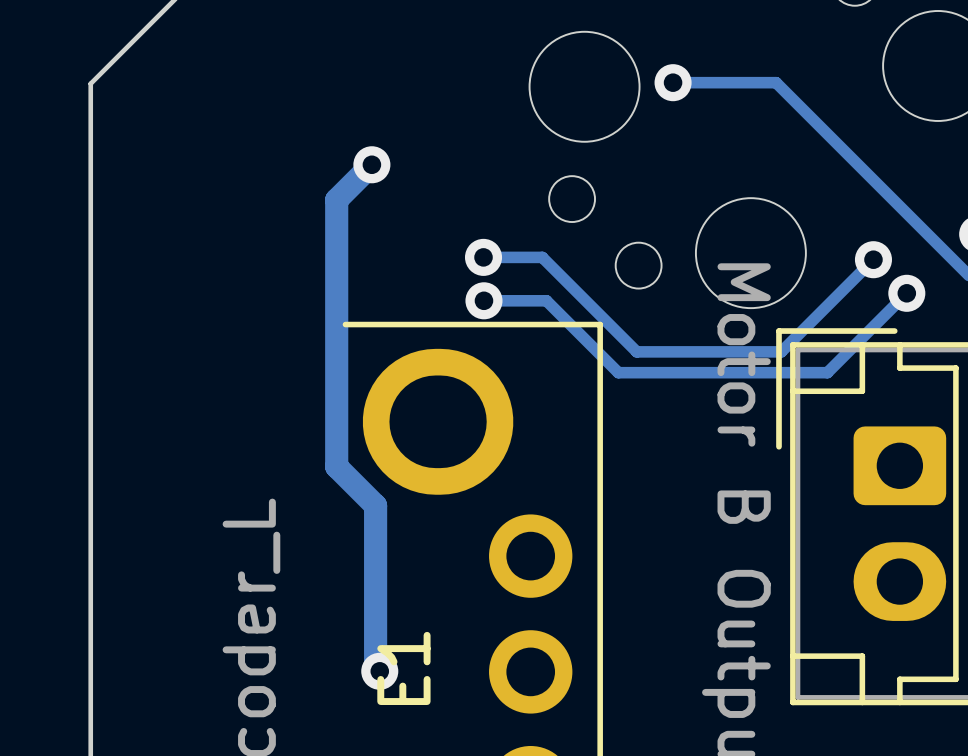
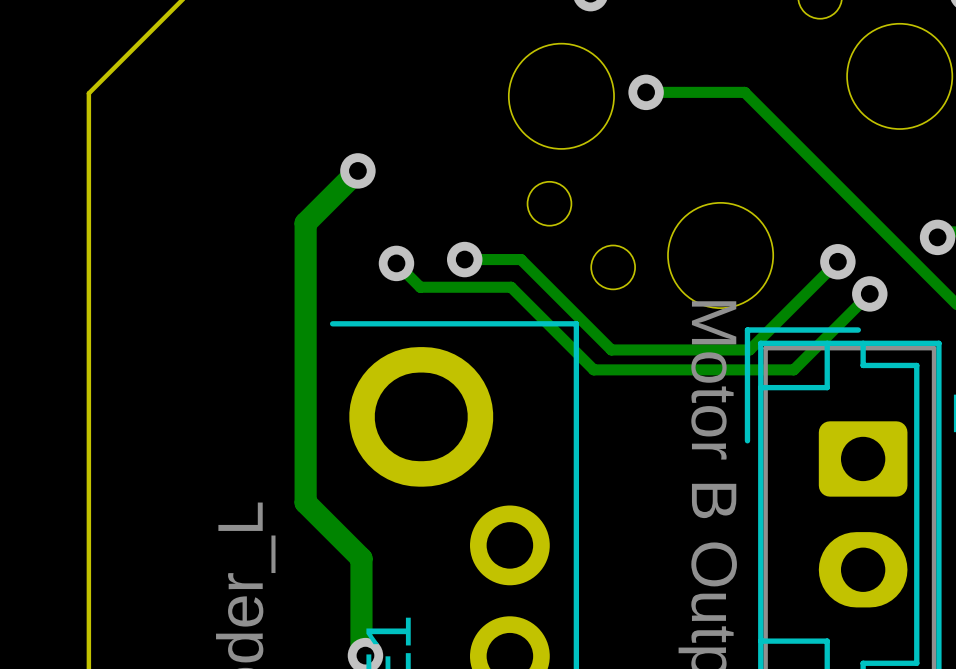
track: (336, 199) (336, 466) (375, 505) (375, 569) -> (324, 204) (305, 223) (305, 502) (361, 558)
via position: (483, 300) -> (396, 263)
track: (546, 300) (483, 300) -> (525, 301) (511, 287) (420, 287) (396, 263)

